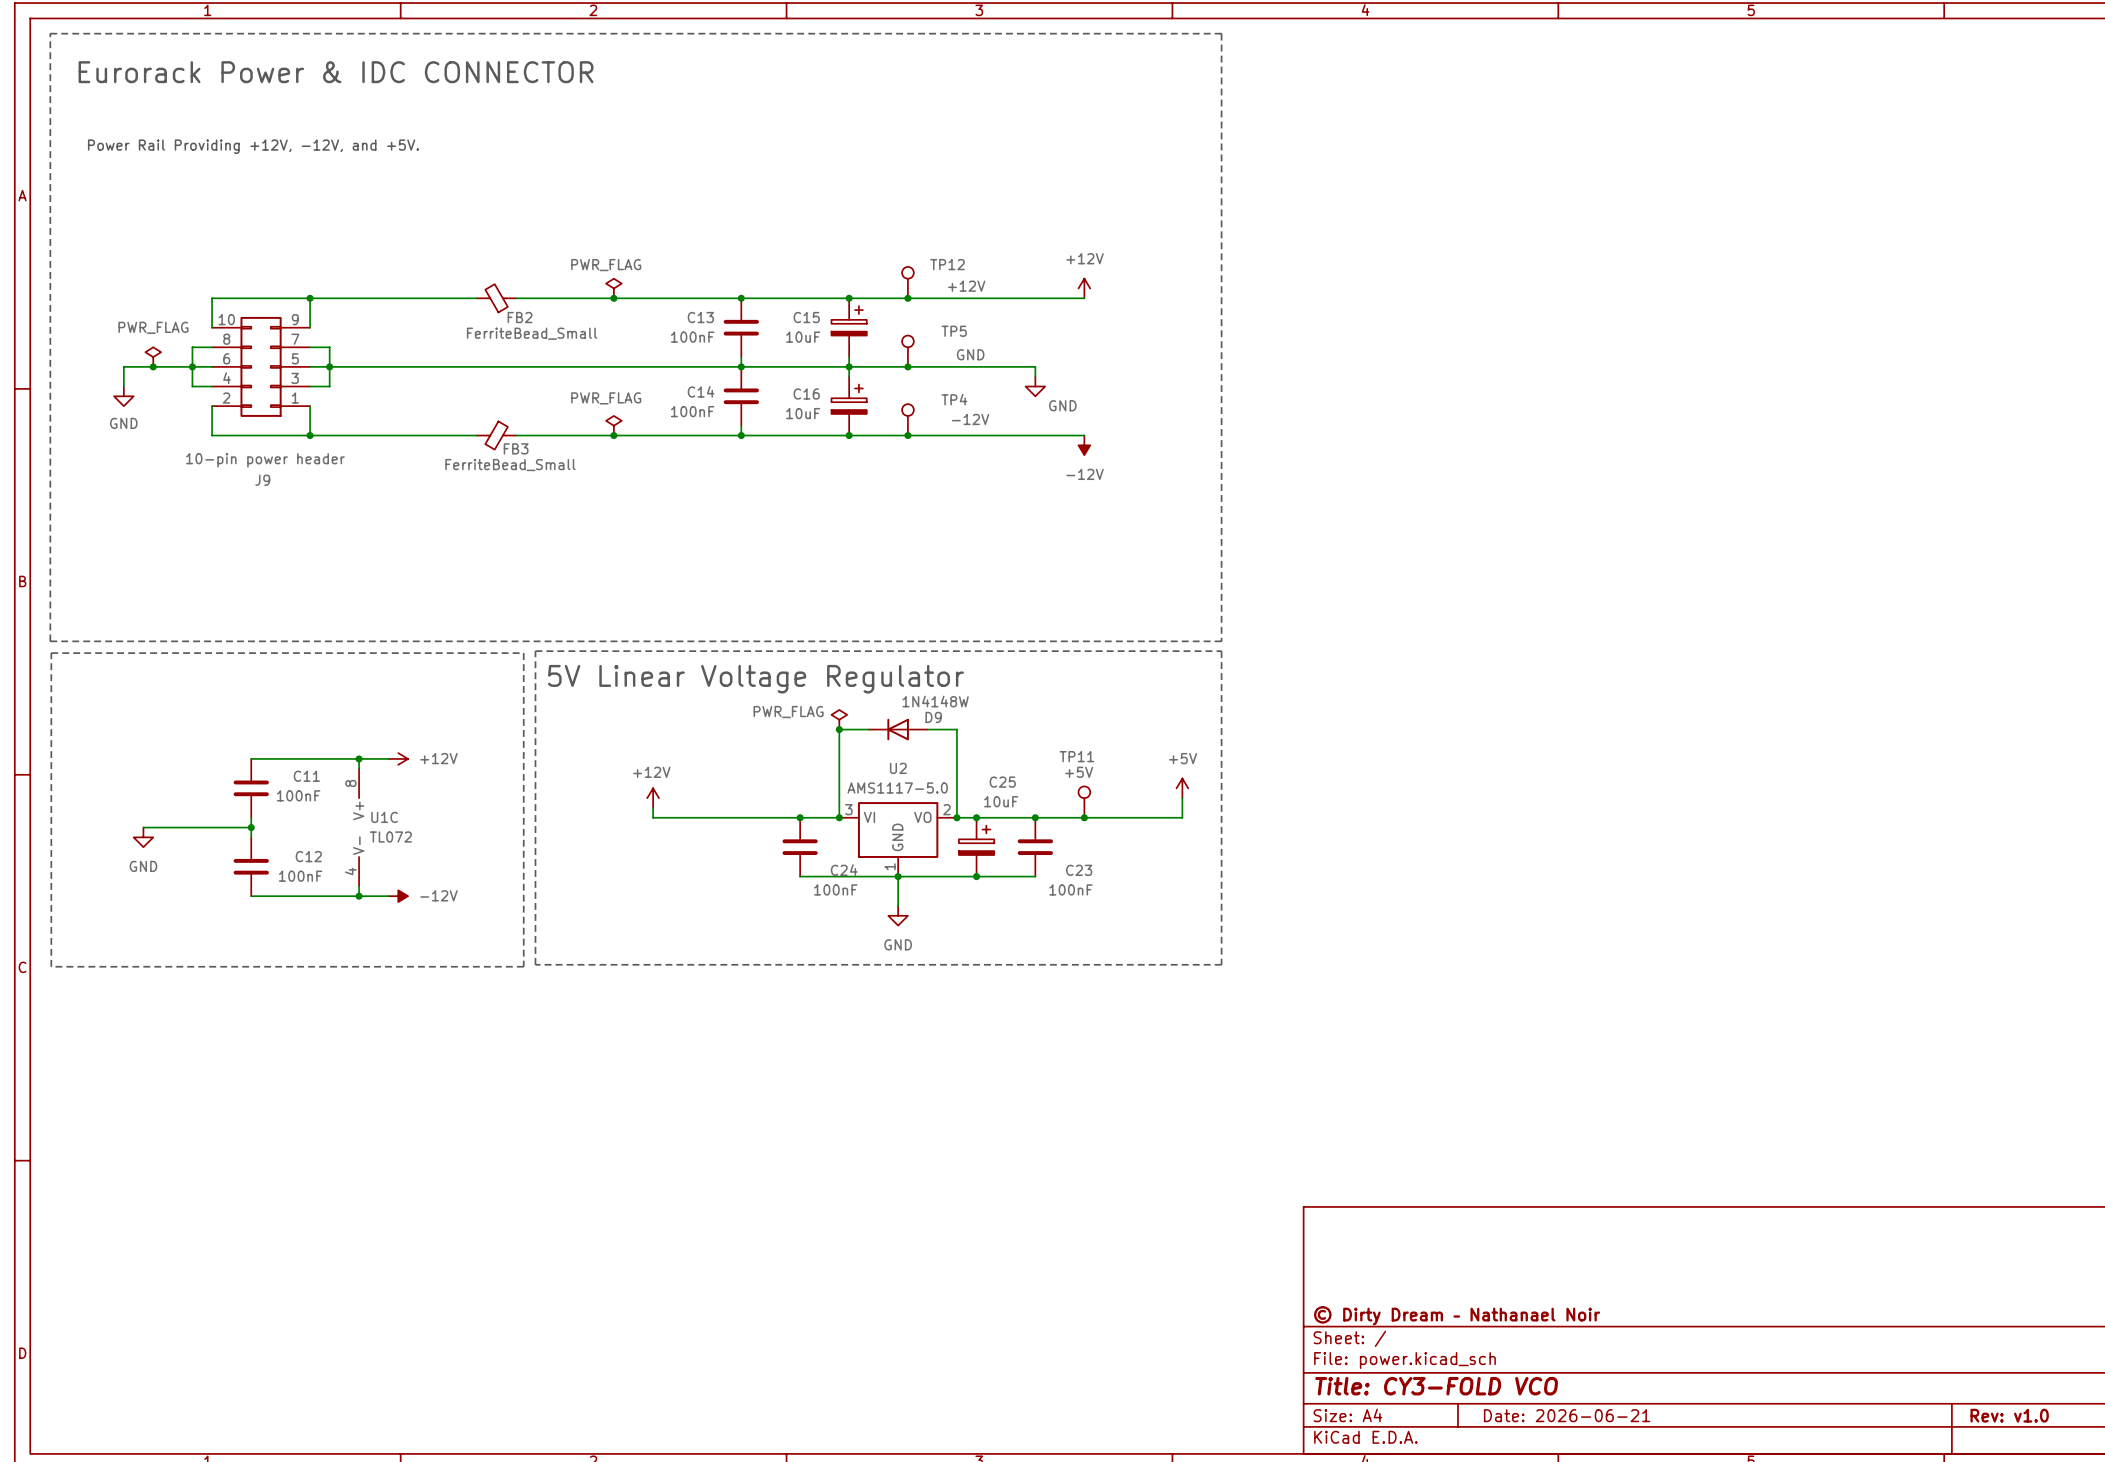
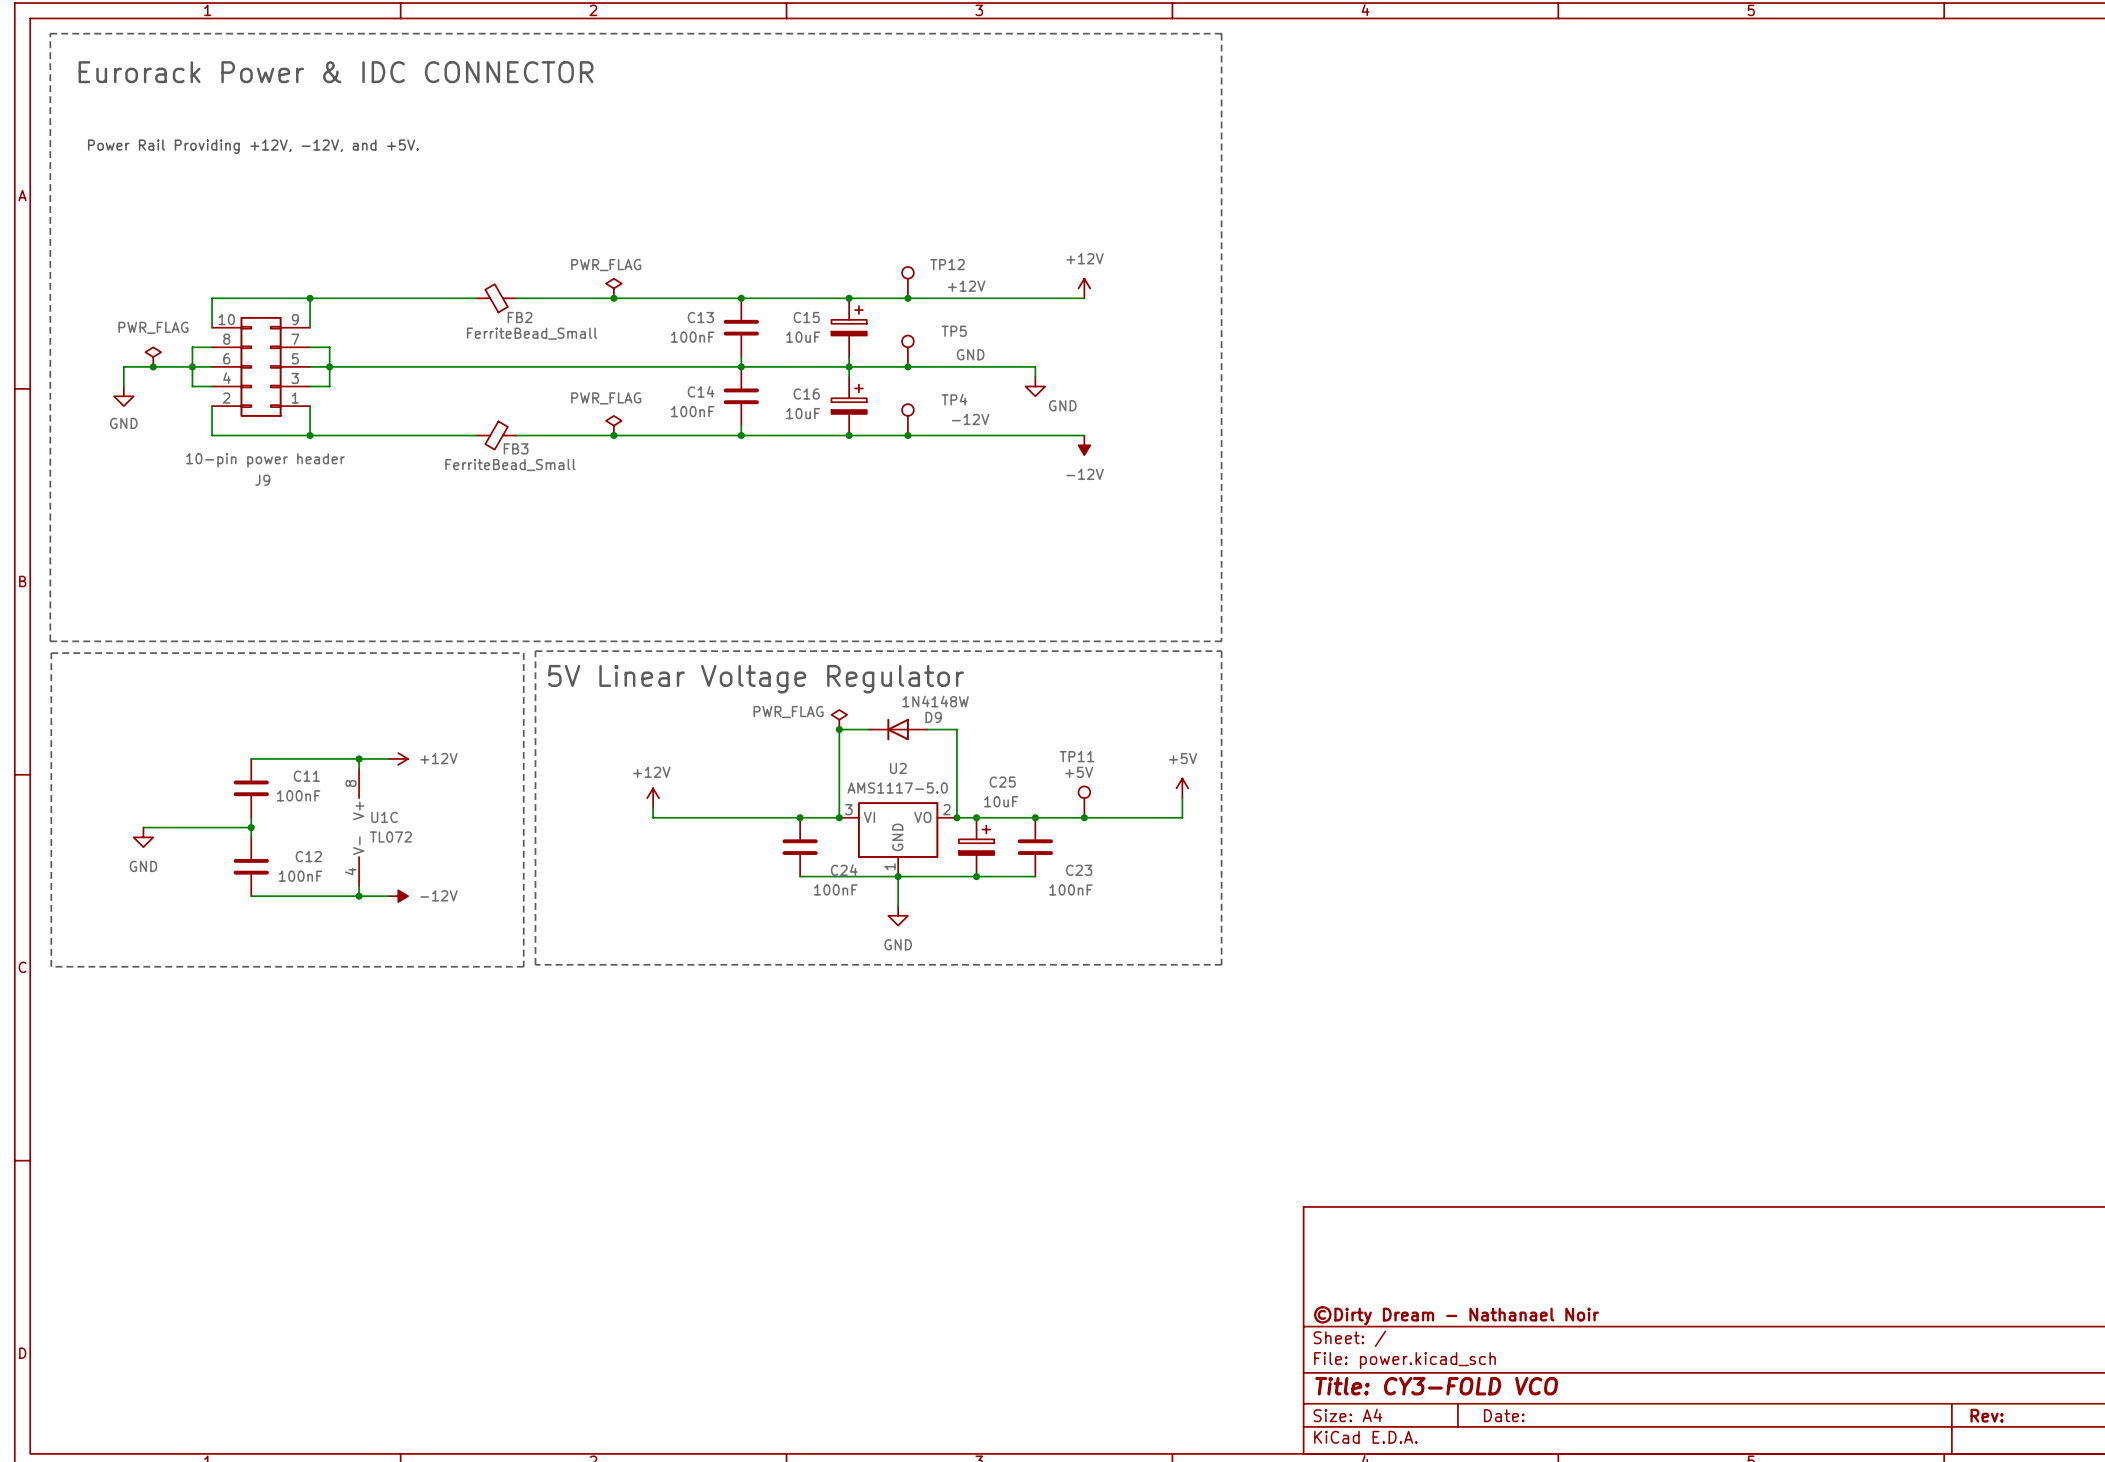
title block: © Dirty Dream – Nathanael Noir (1457, 1315) -> ©Dirty Dream - Nathanael Noir (1456, 1315)
title block: Date: 2026-06-21 (1567, 1415) -> Date: (1504, 1415)
title block: Rev: v1.0 (2009, 1415) -> Rev: (1987, 1415)

